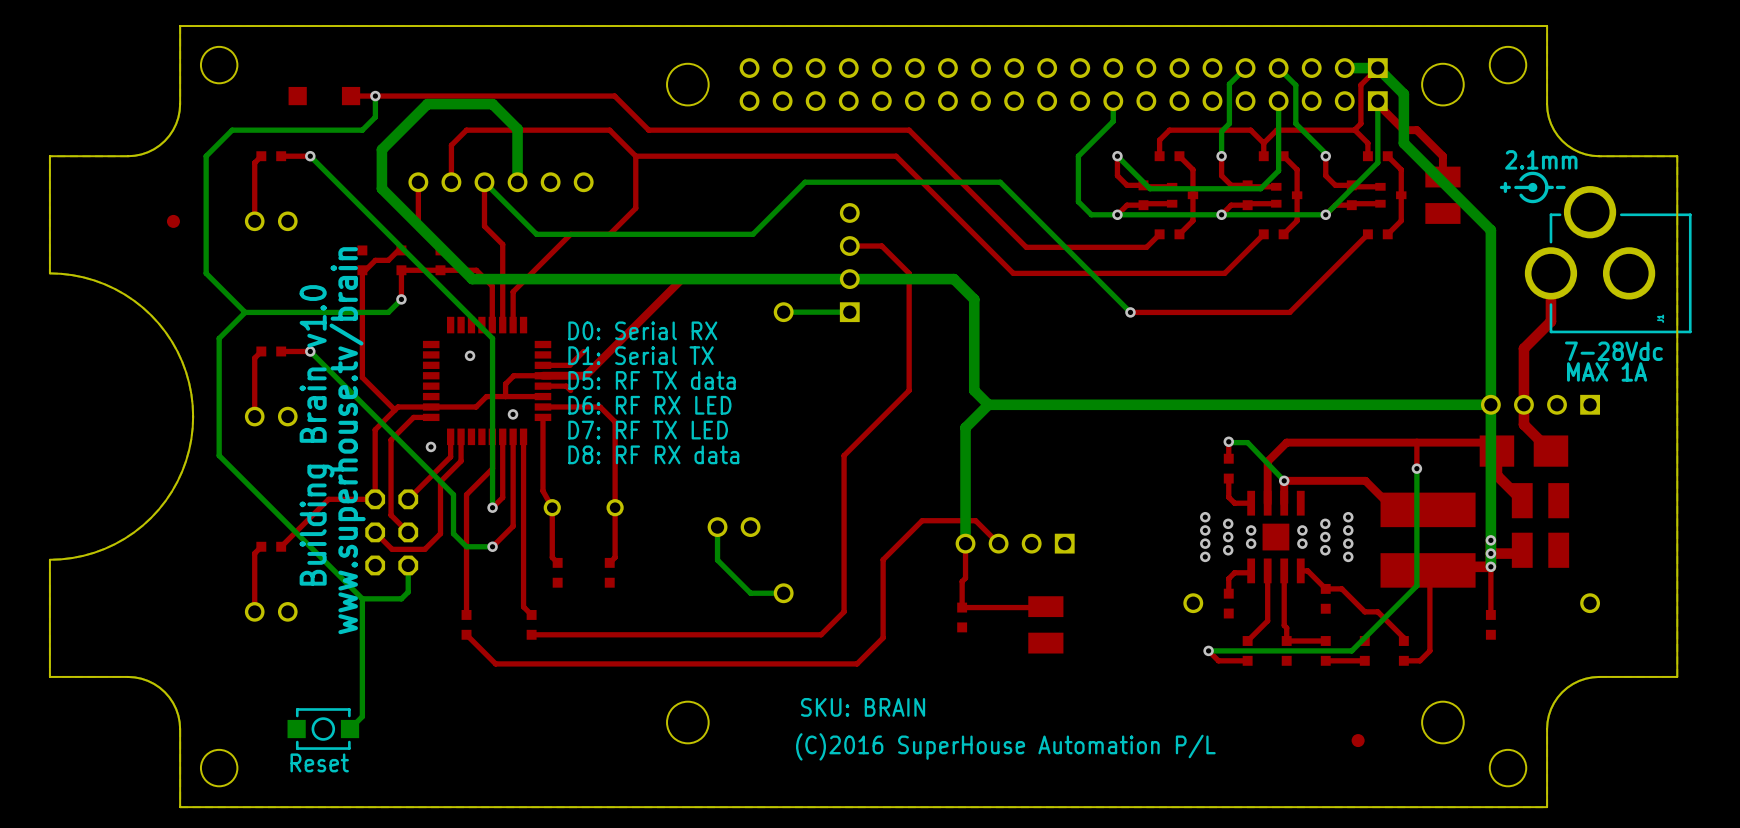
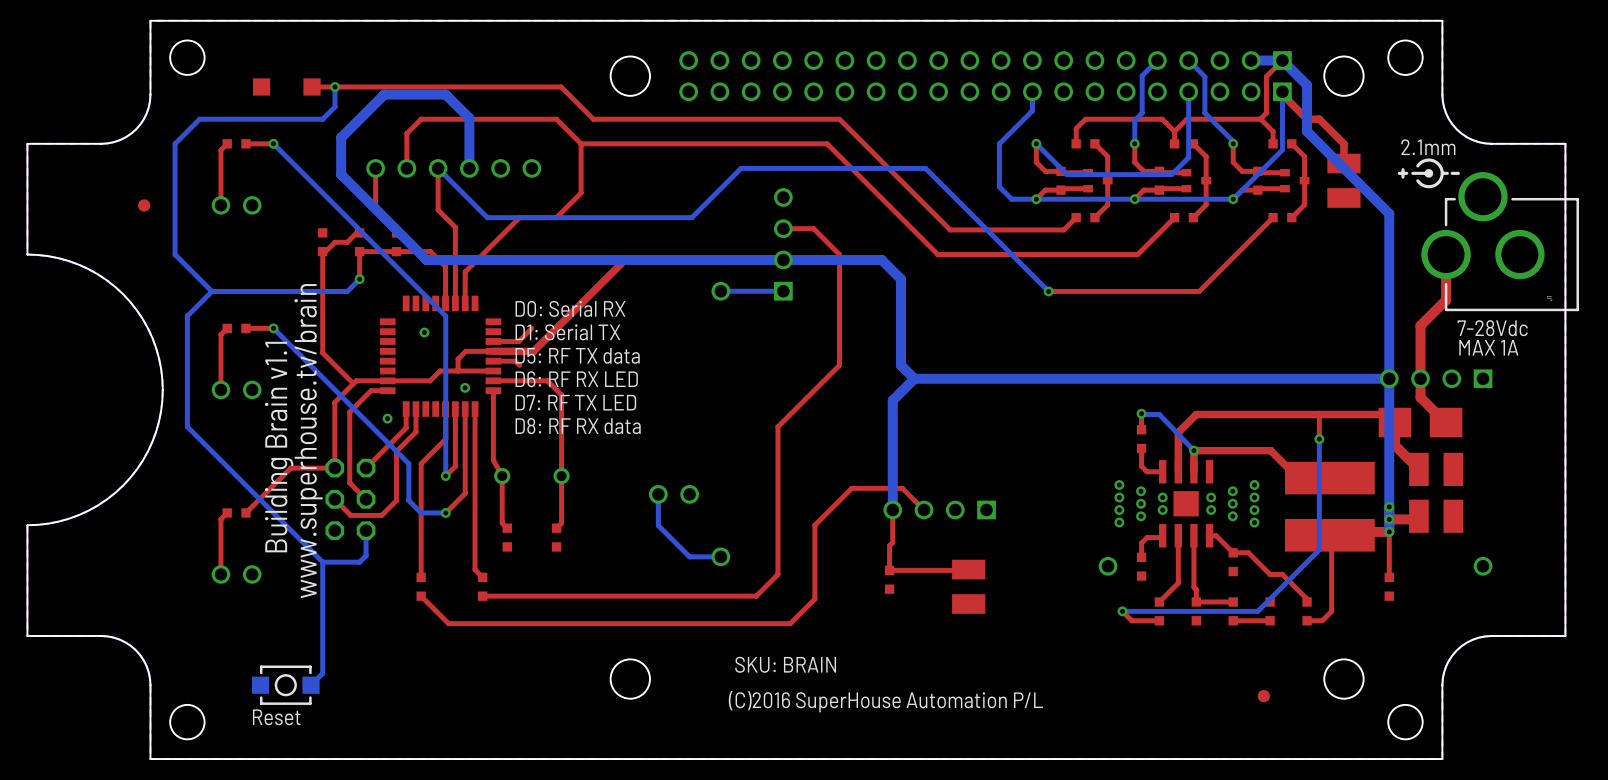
text: Building Brain v1.0 (317, 435) -> Building Brain v1.1 (279, 447)

